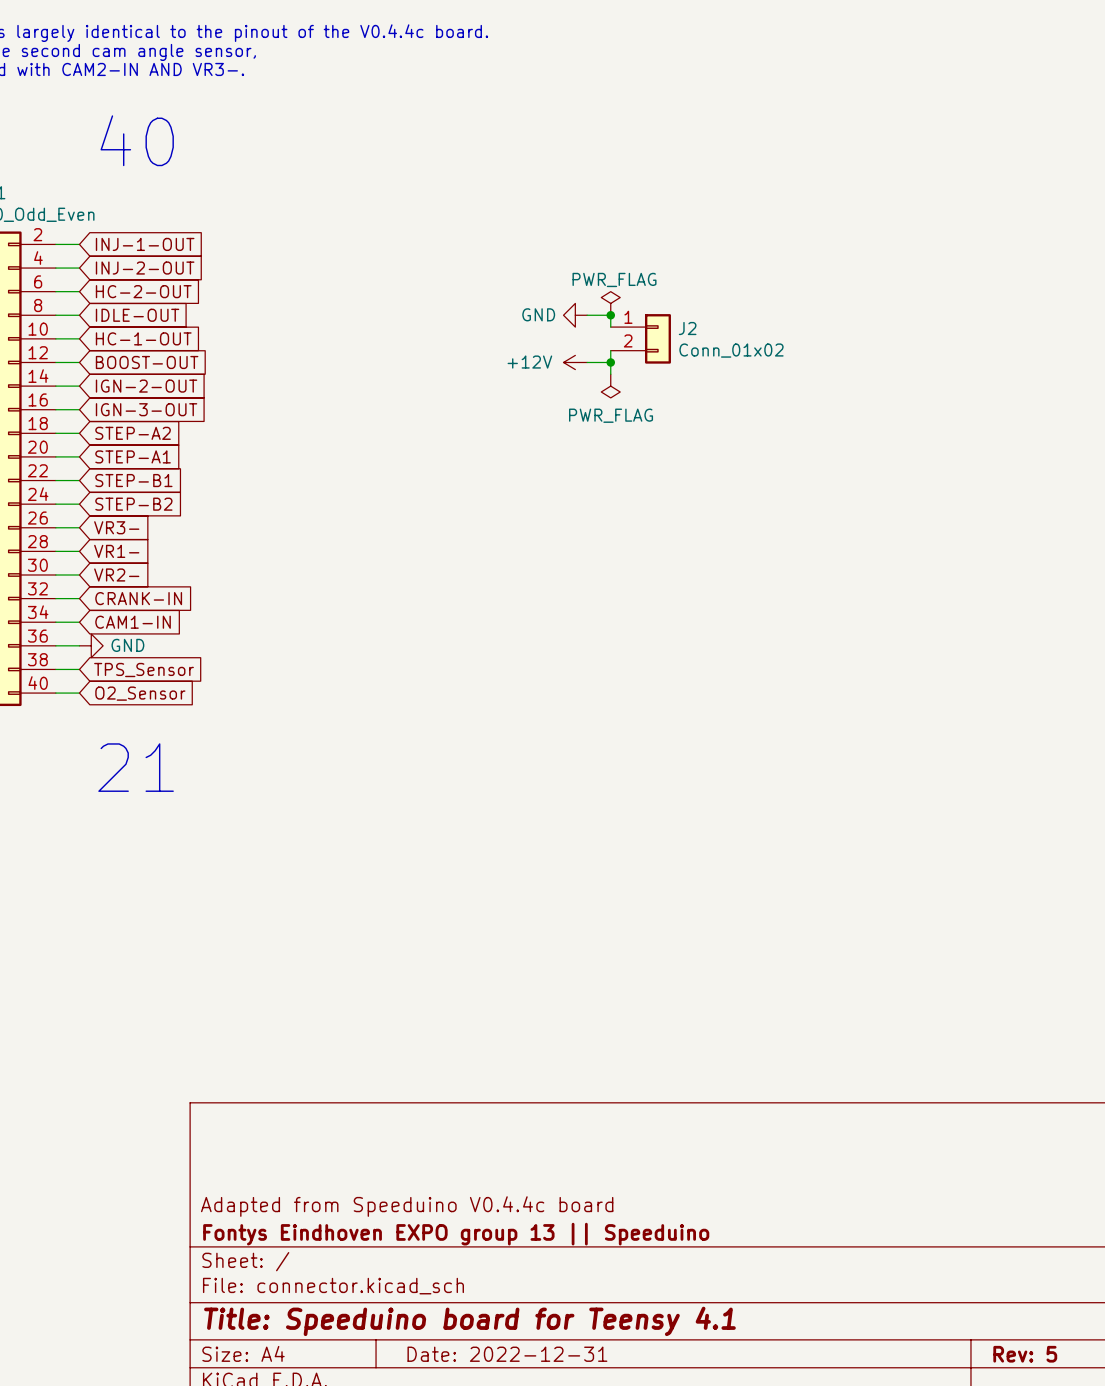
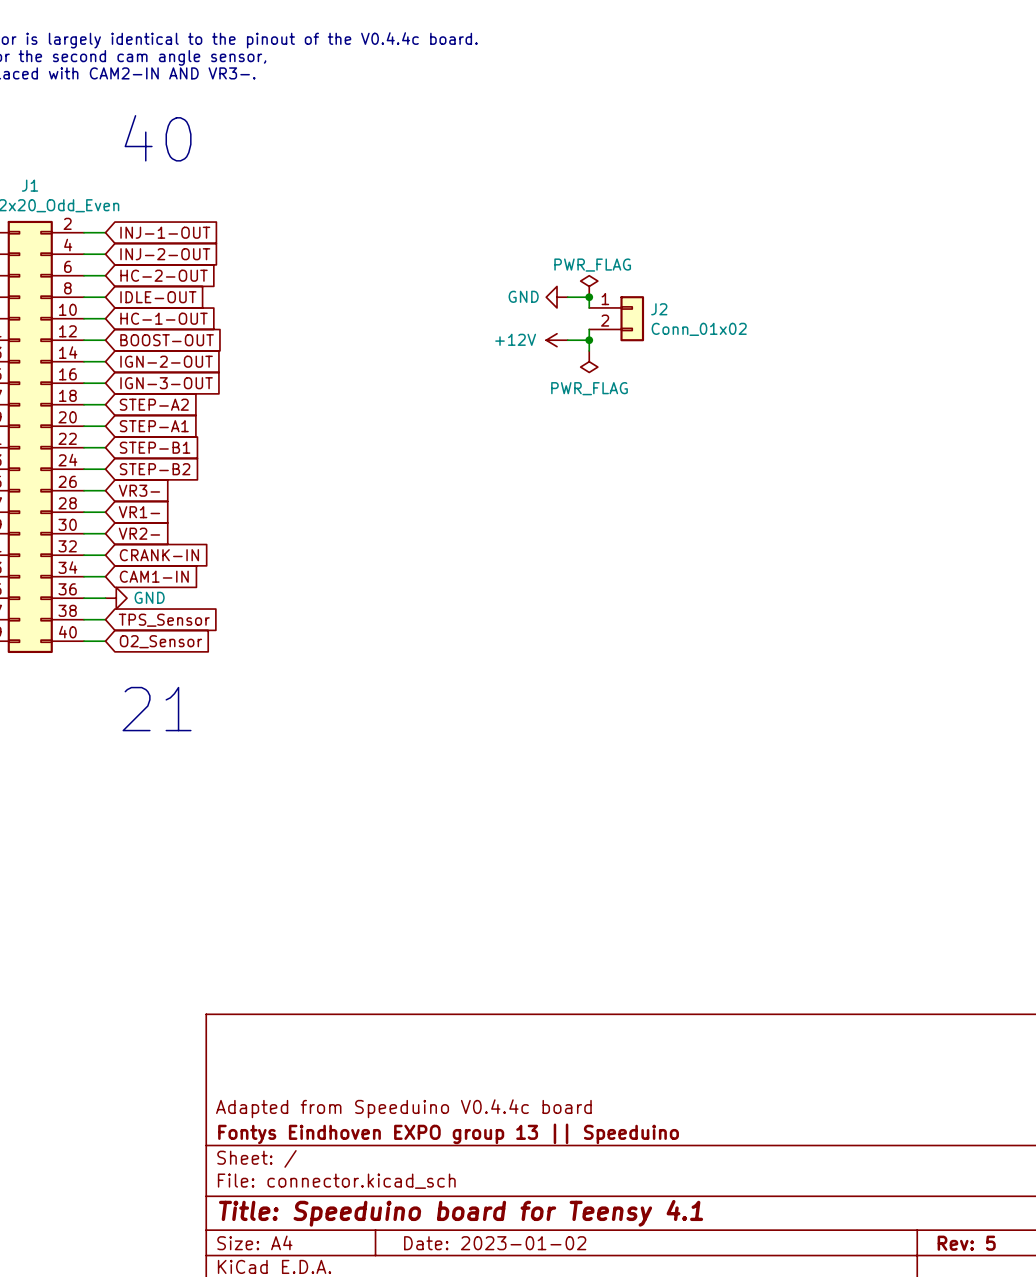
title block: Date: 2022-12-31 (507, 1354) -> Date: 2023-01-02 (495, 1243)

